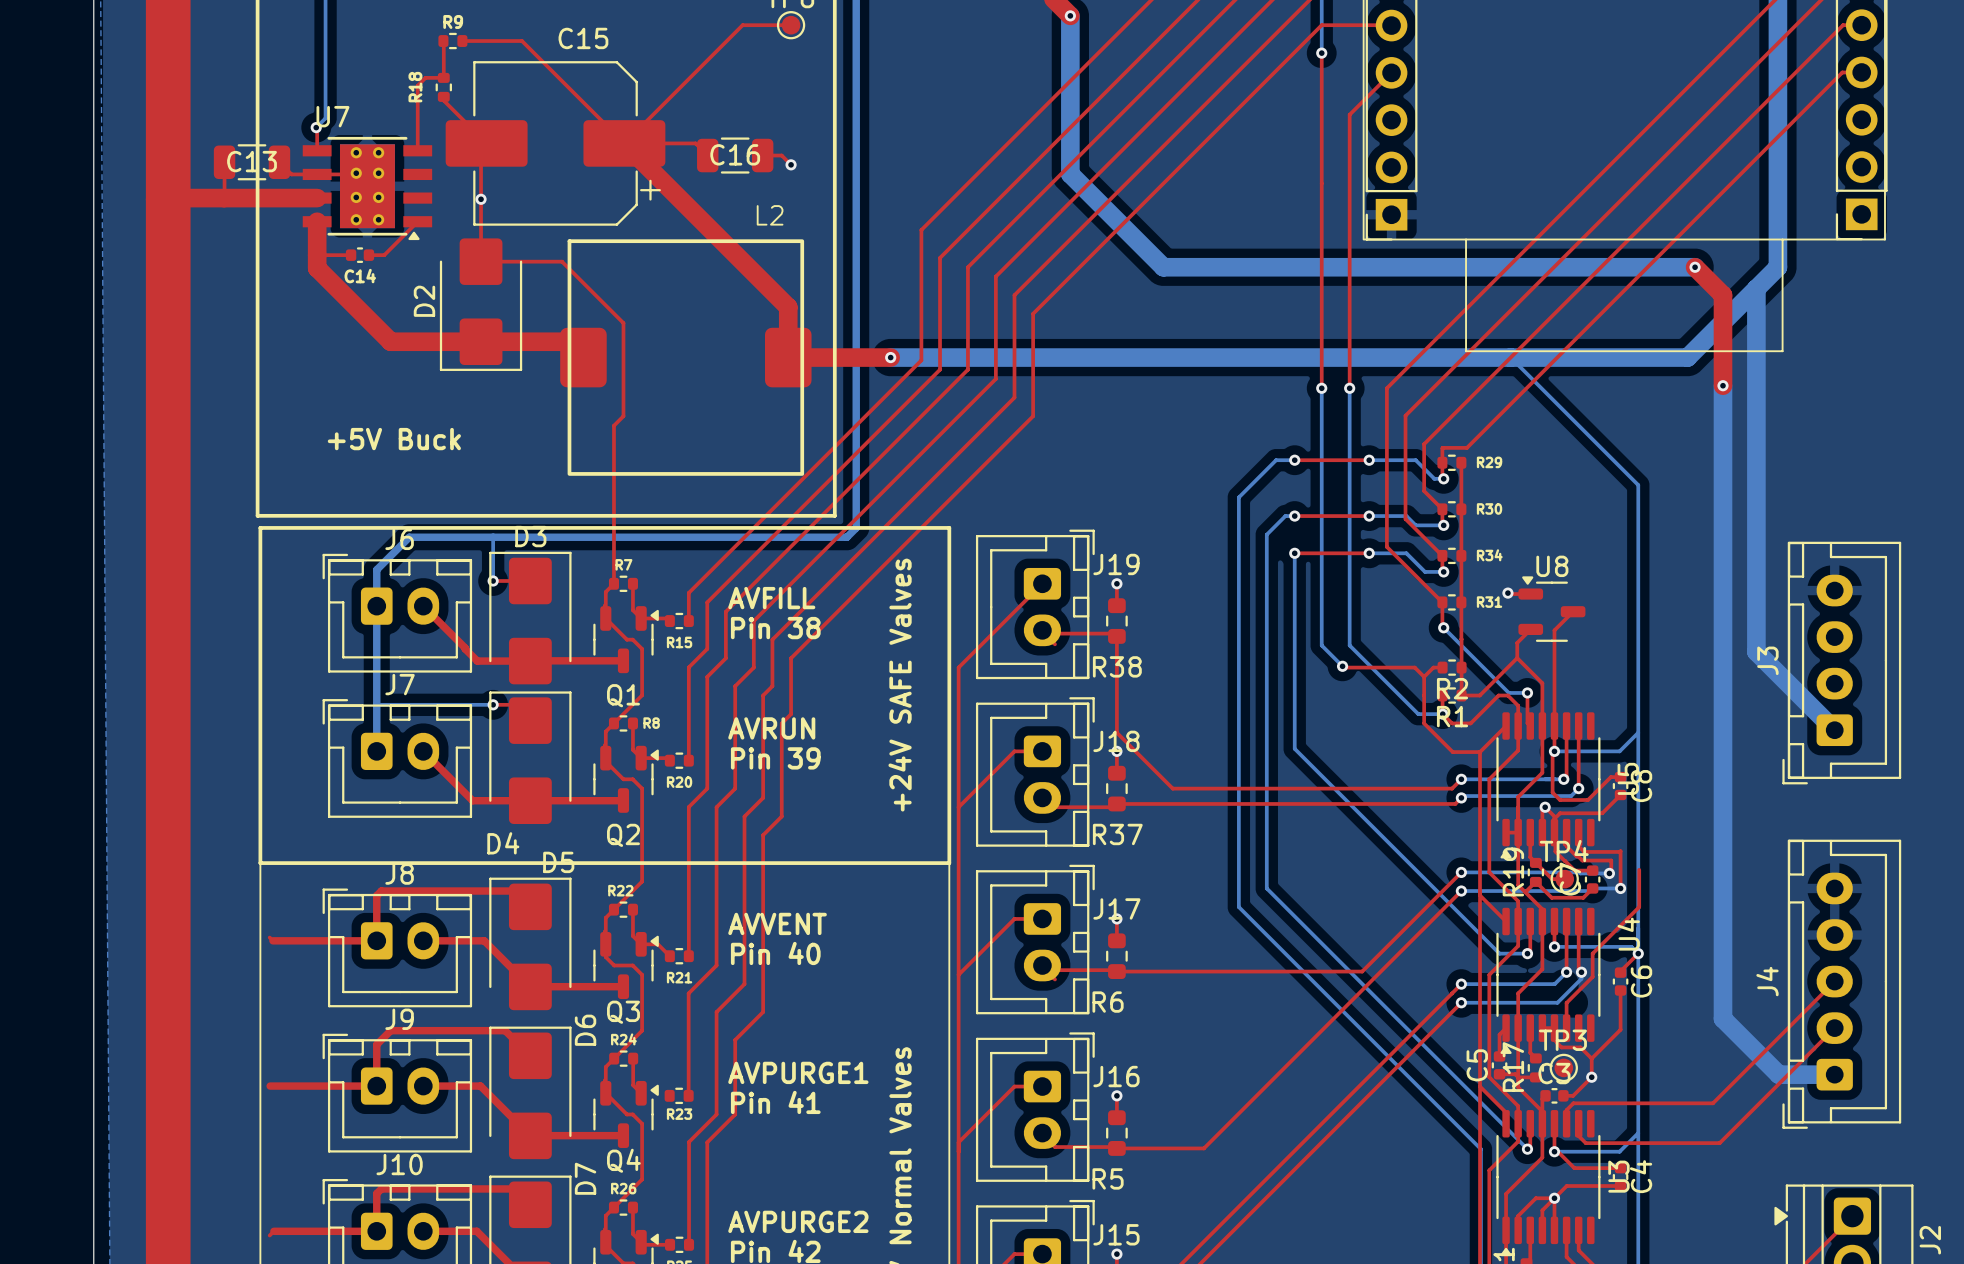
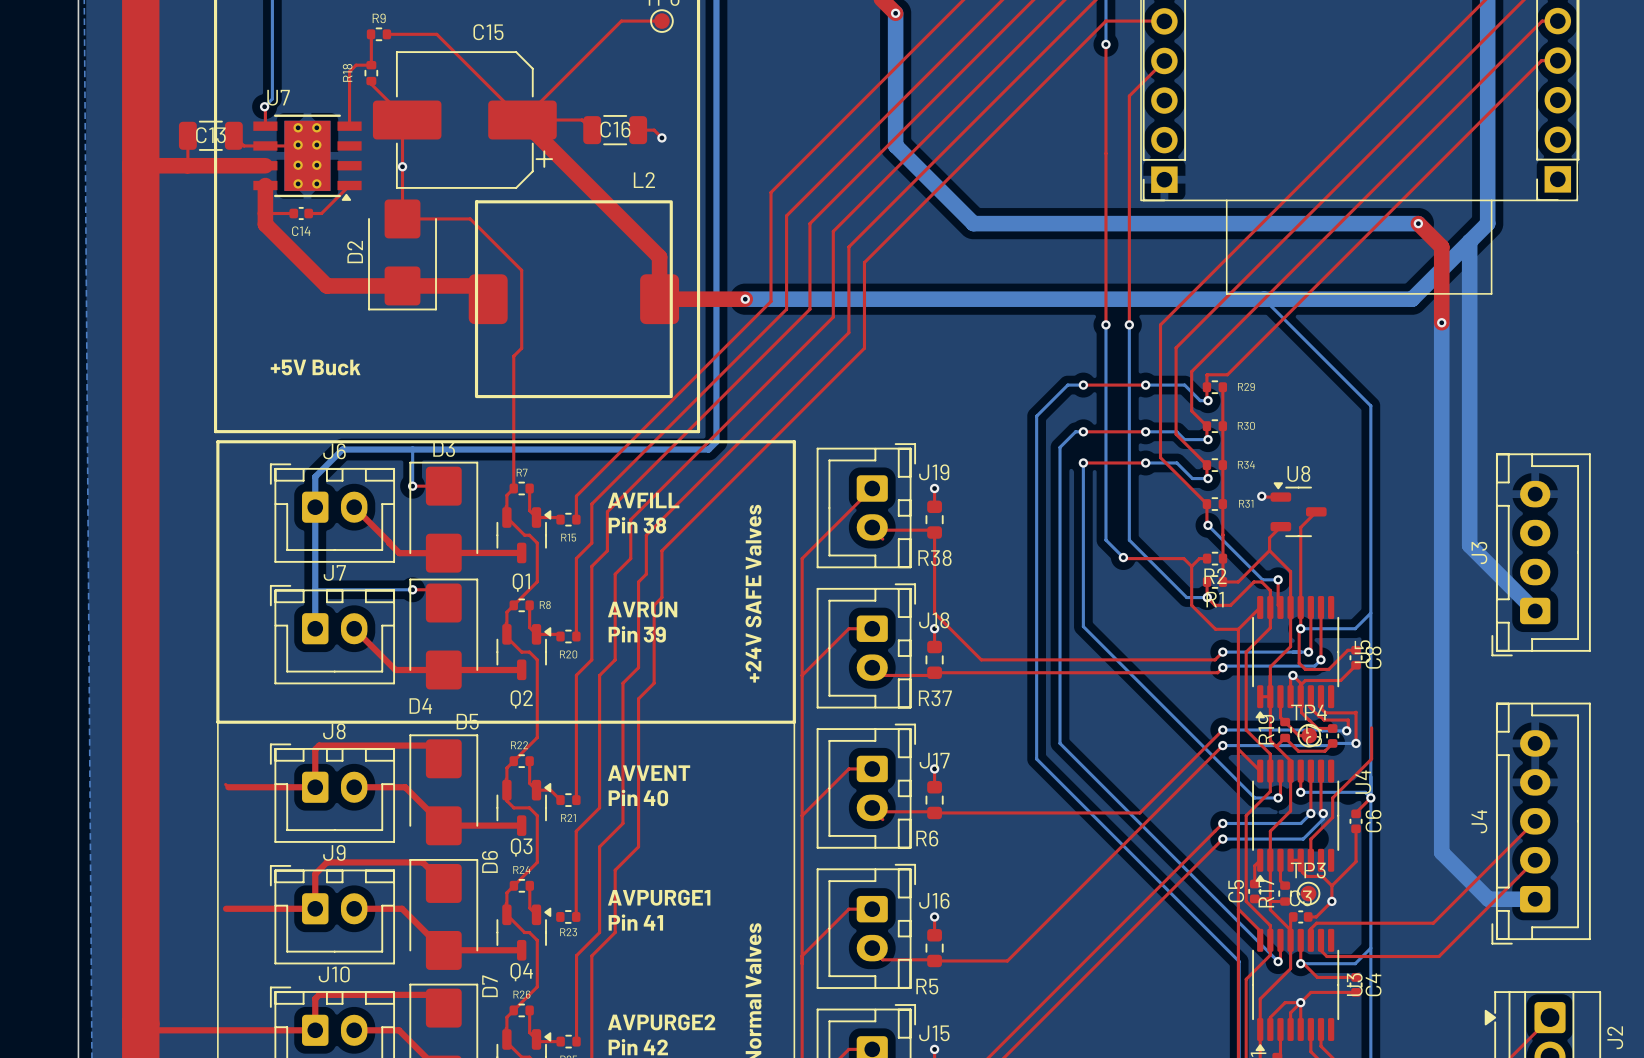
top track: (273, 1231) (269, 1235) -> (229, 1030) (147, 1030) (140, 1023)

